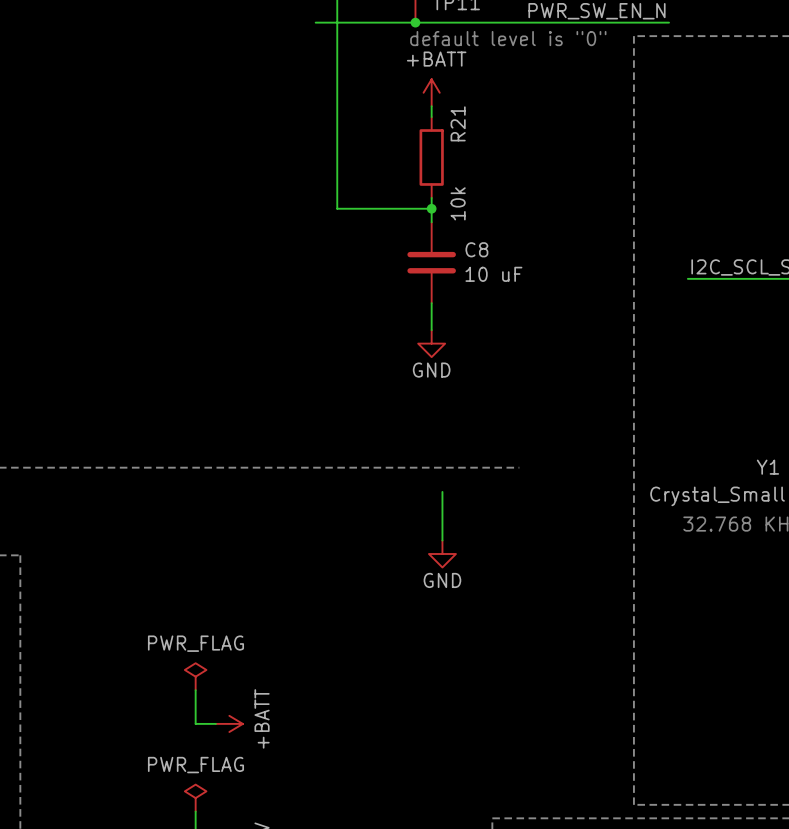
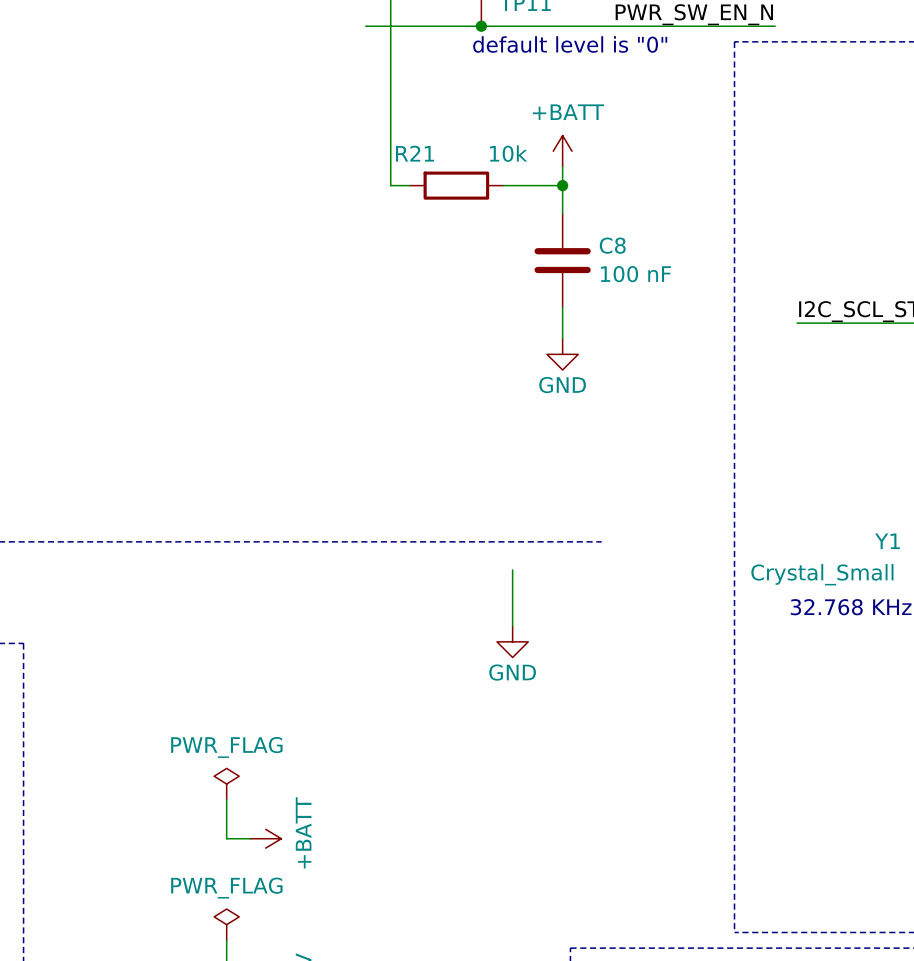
power symbol position: +BATT (431, 92) -> +BATT (562, 151)
wire: (431, 106) (431, 117) -> none
R21 name position: R21 (458, 123) -> R21 (415, 153)
wire: none -> (562, 166) (562, 213)
R21 rotation: 0° (431, 157) -> 90° clockwise (456, 185)
wire: (337, 160) (337, 208) (431, 208) -> (390, 185) (409, 185)
wire: none -> (503, 185) (562, 185)
junction: none -> (562, 185)
wire: (431, 197) (431, 222) -> none
R21 value position: 10k (458, 203) -> 10k (508, 153)
junction: (431, 208) -> none
C8 position: (431, 262) -> (562, 260)
C8 value: 10 uF (493, 274) -> 100 nF (635, 274)
wire: (431, 303) (431, 330) -> (562, 307) (562, 338)
power symbol position: GND (431, 343) -> GND (562, 354)

